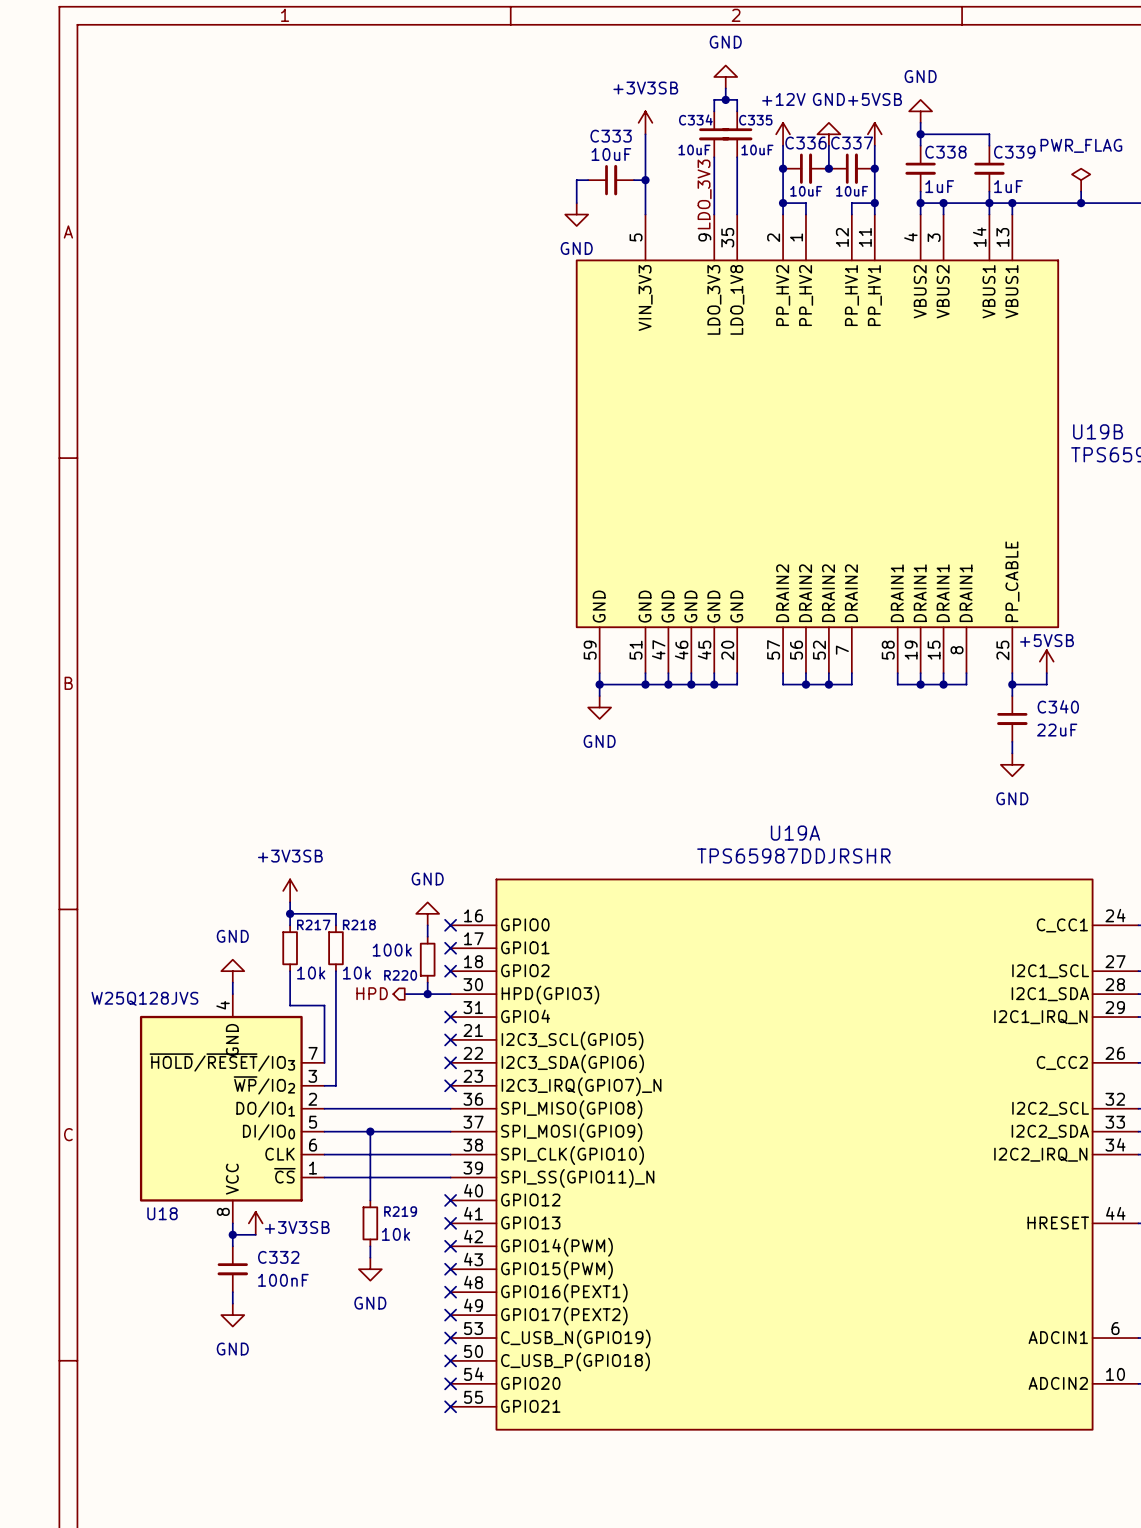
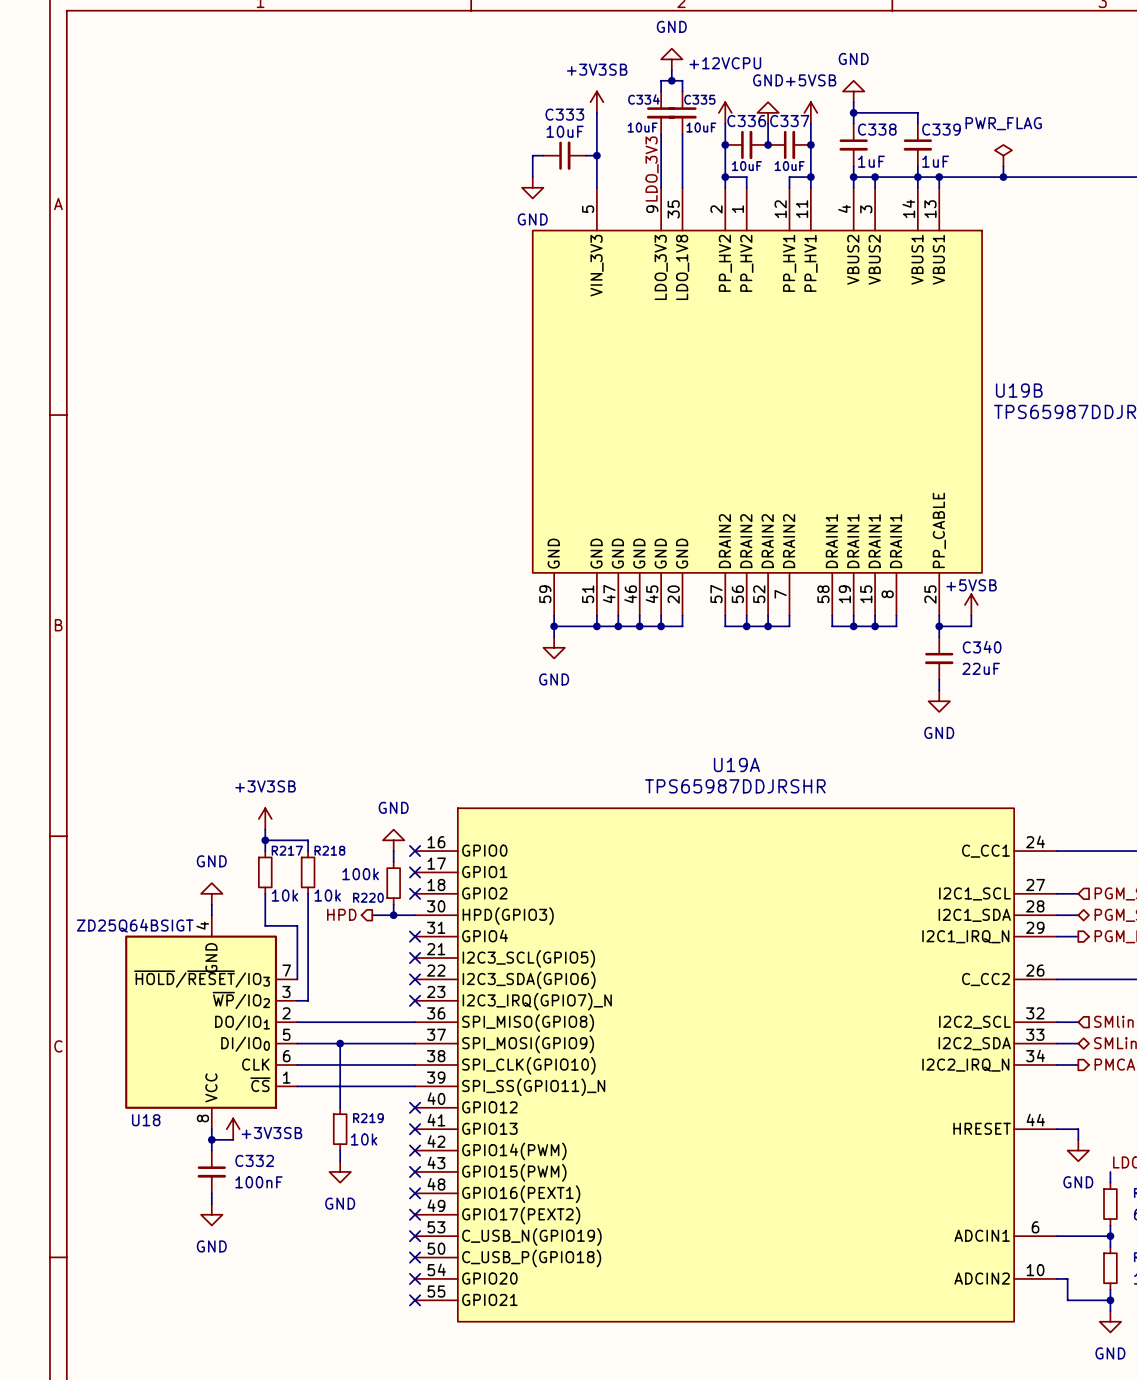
power symbol: +12V (783, 134) -> +12VCPU (725, 112)
U18 value: W25Q128JVS (144, 998) -> ZD25Q64BSIGT (135, 925)

